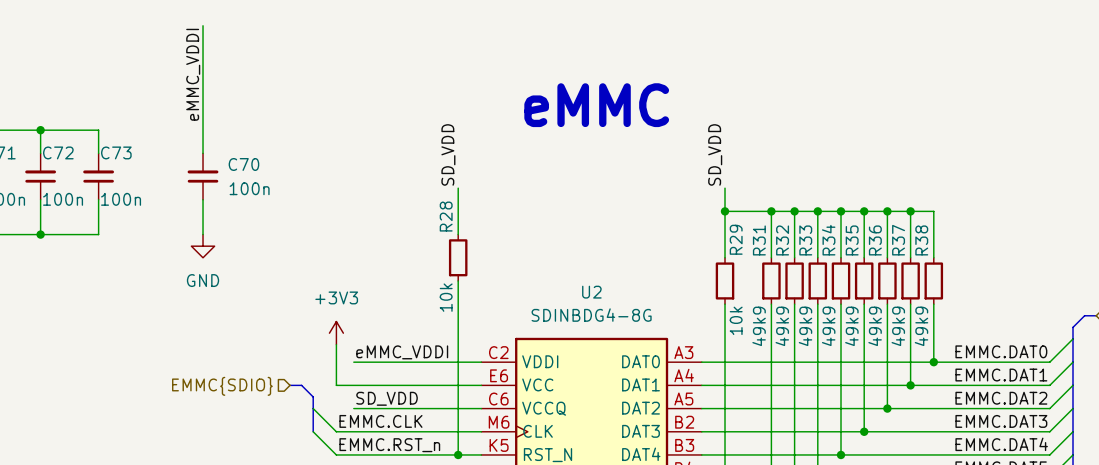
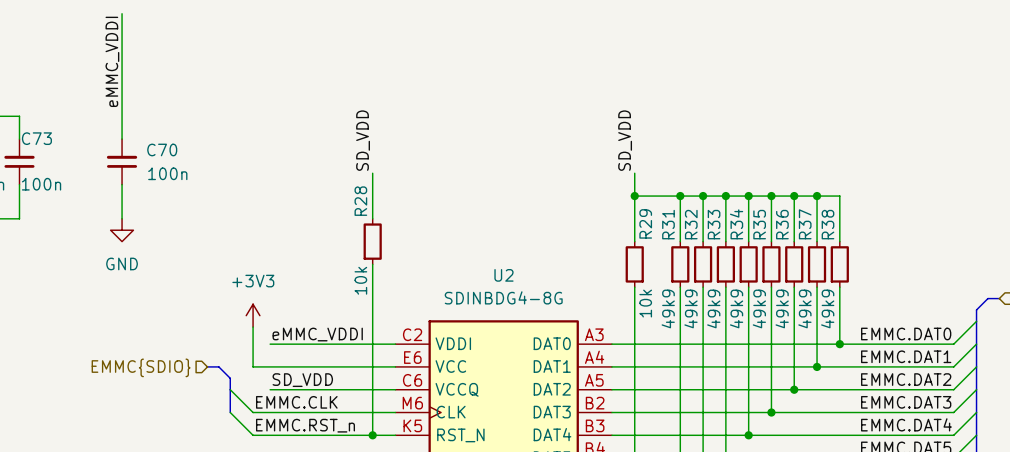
text: eMMC (596, 105) -> none

